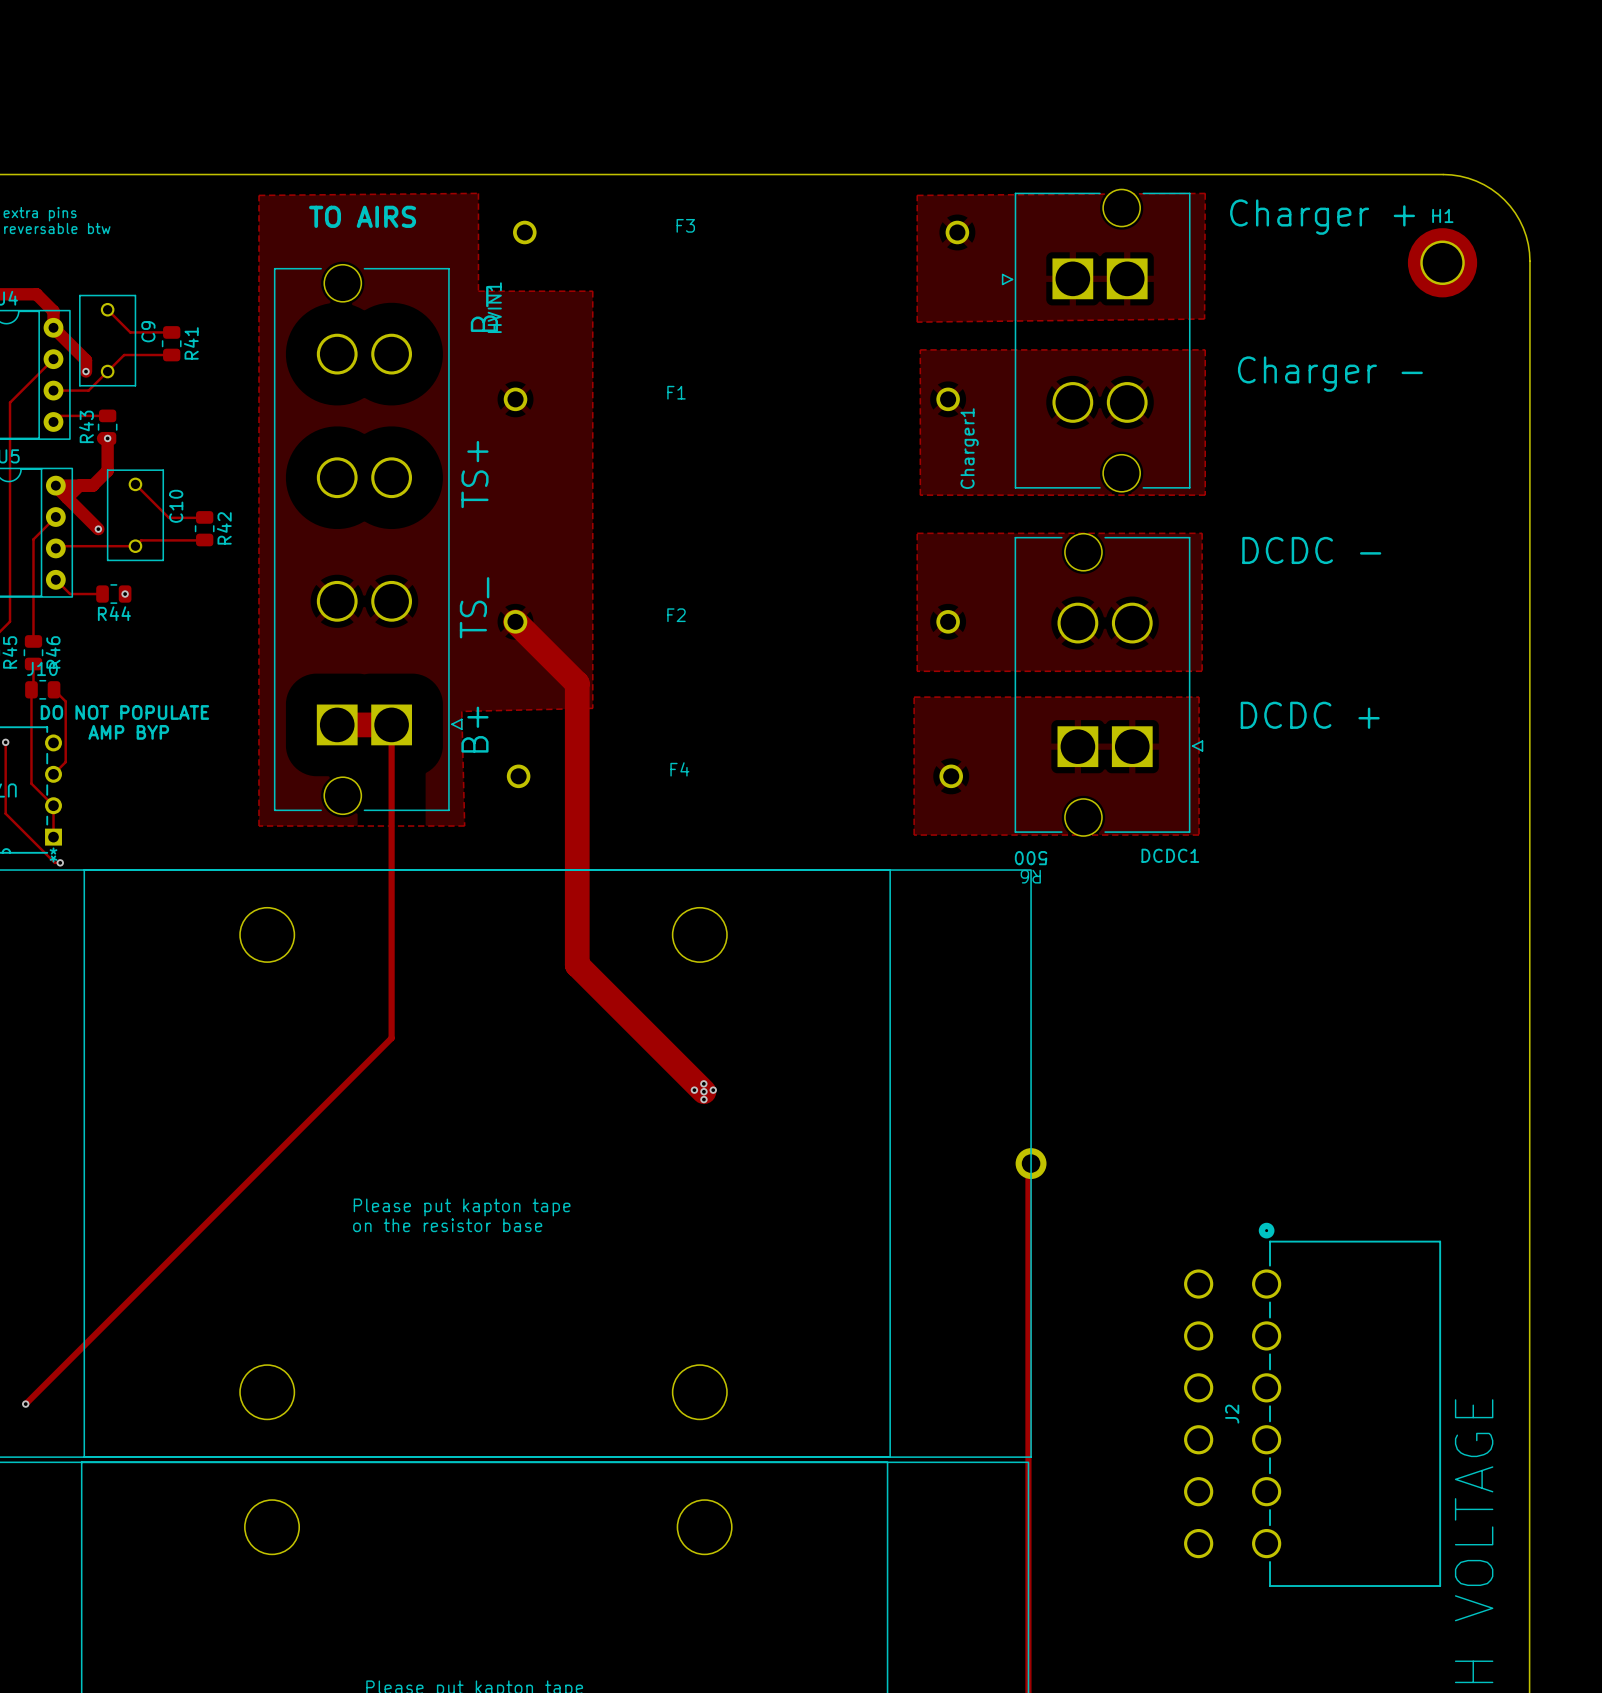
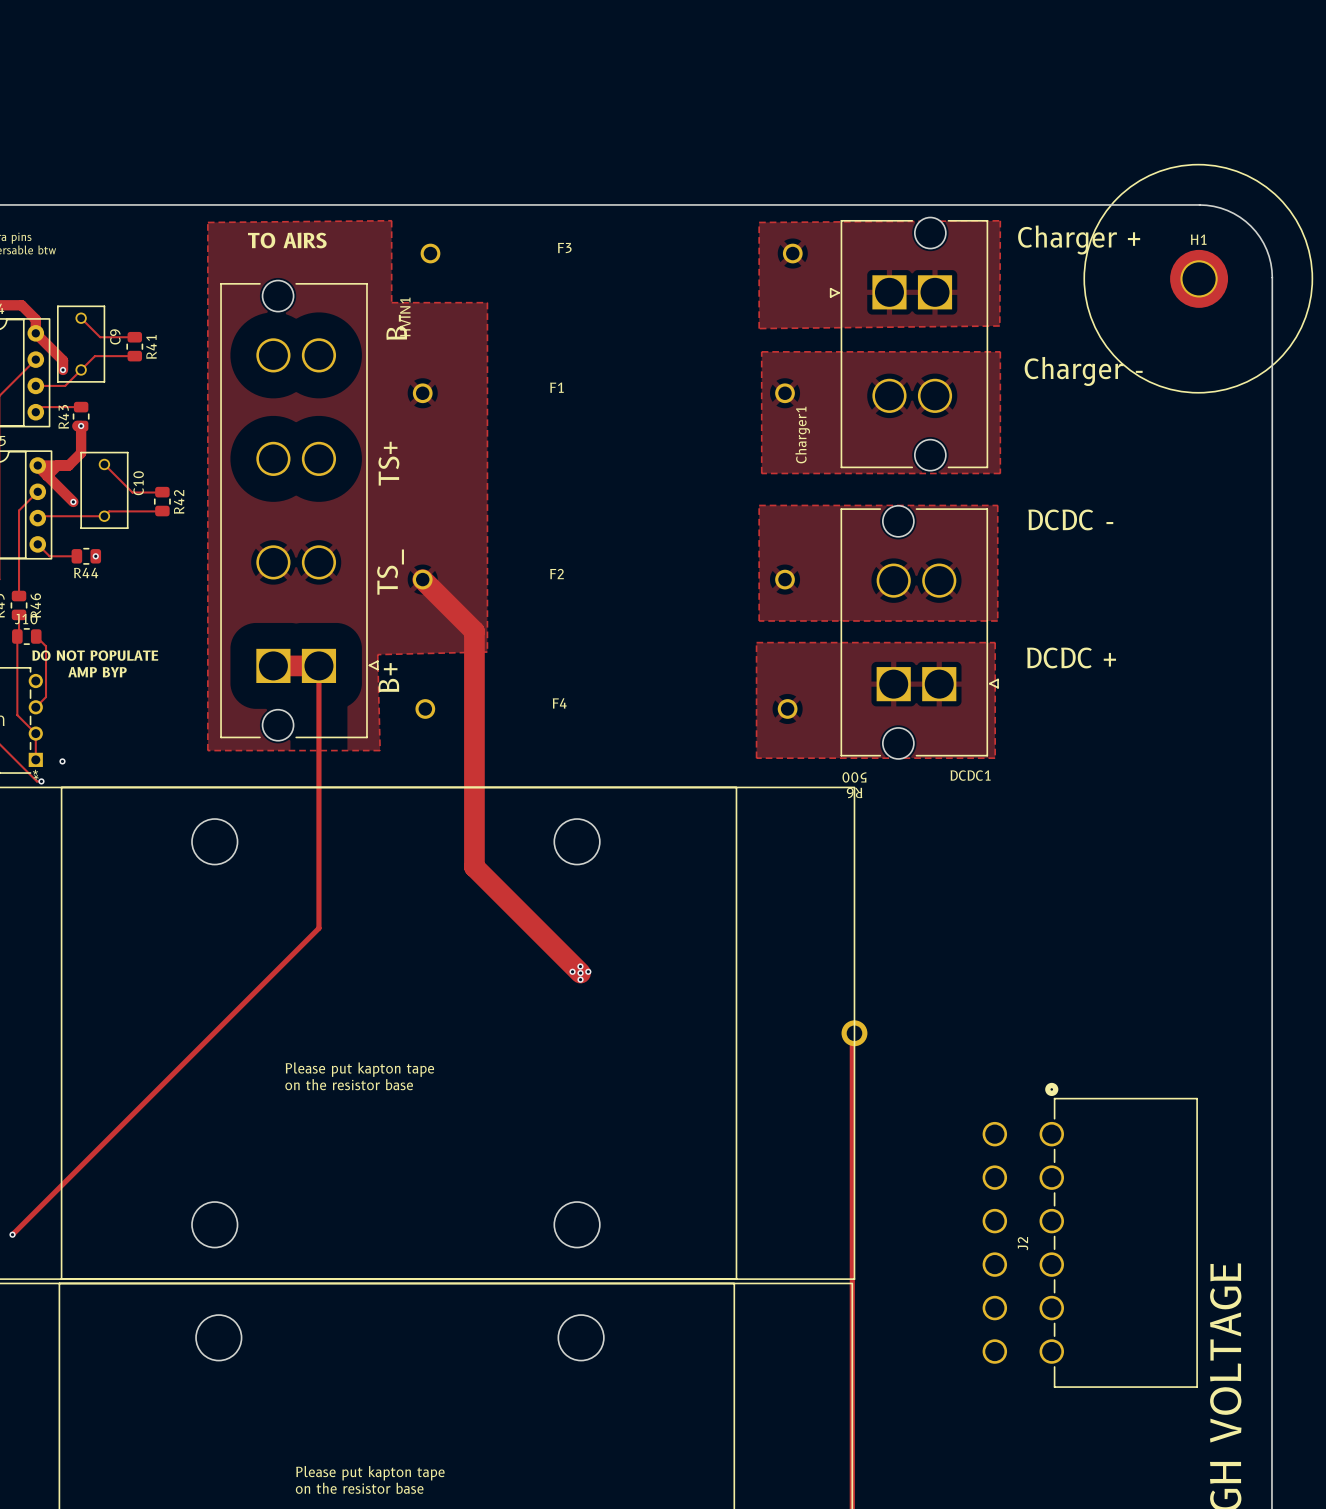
drawing: none -> [1083, 164, 1313, 394]
via: none -> (62, 761)

